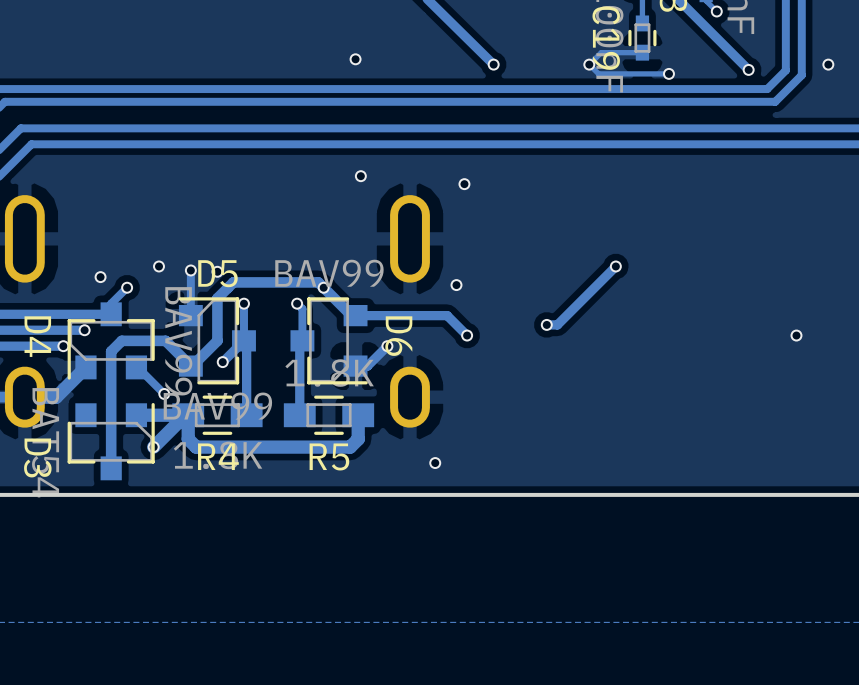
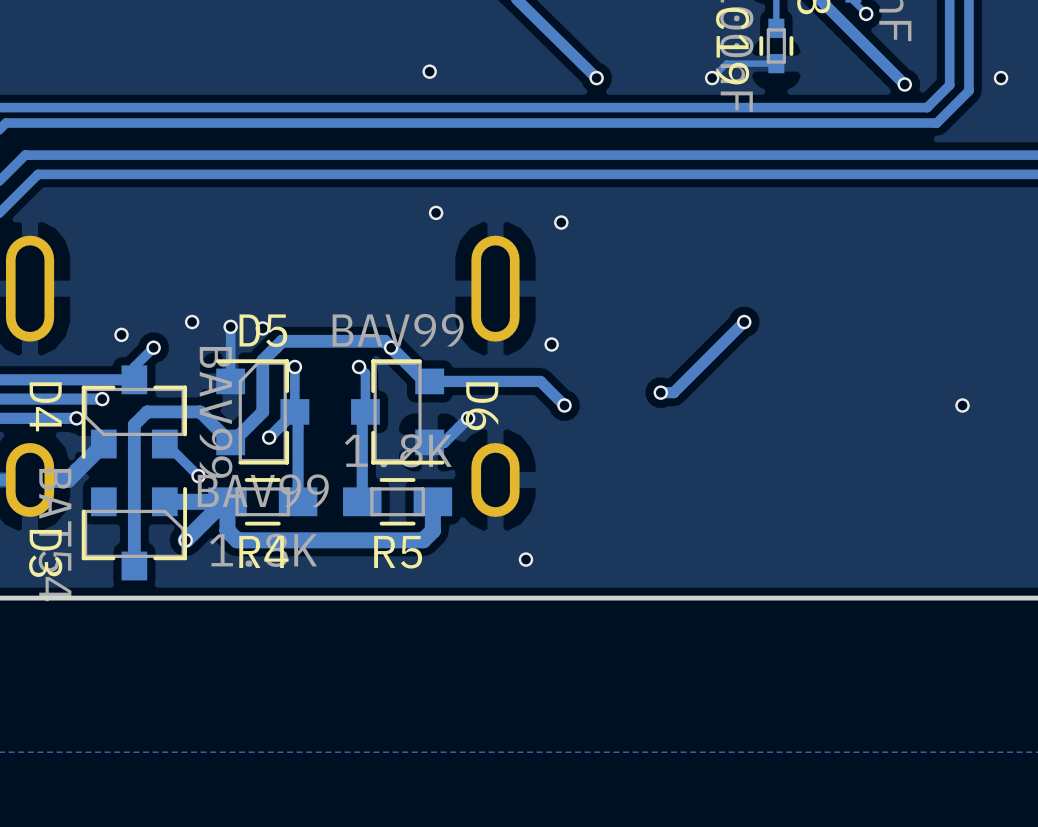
track: (589, 64) (598, 73) (668, 73) -> none
via: (668, 73) -> none

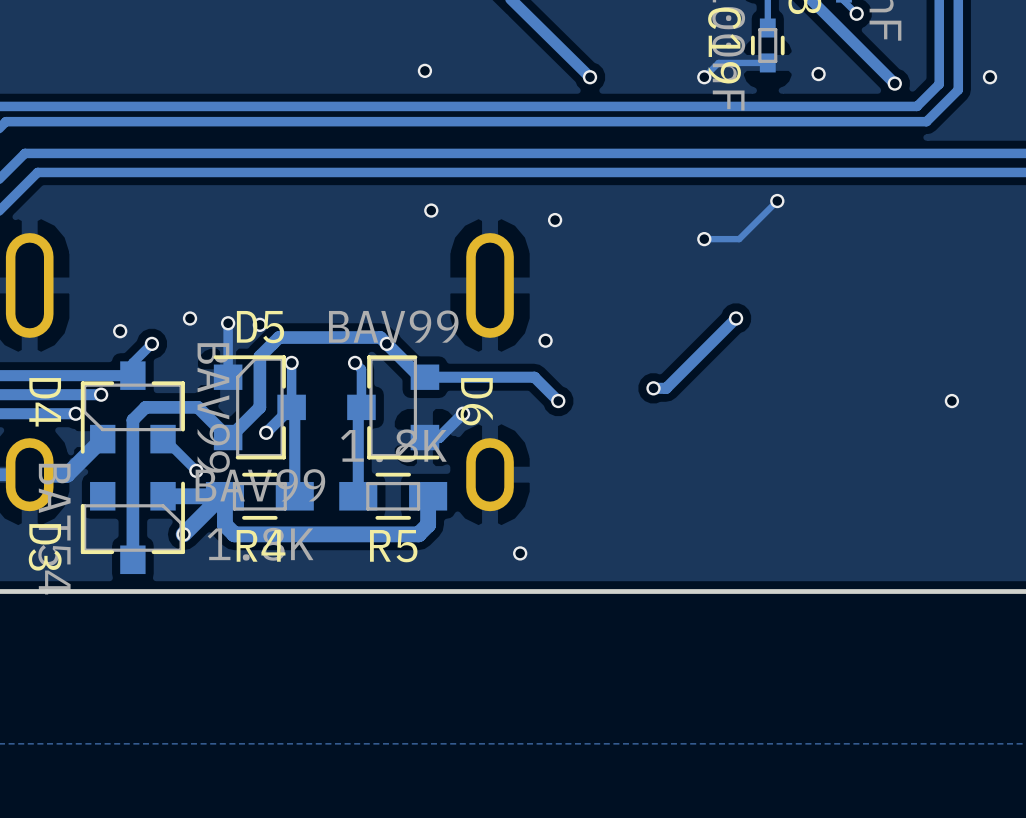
via: none -> (818, 74)
track: none -> (777, 201) (739, 239) (704, 239)
via: none -> (777, 201)
via: none -> (704, 239)

